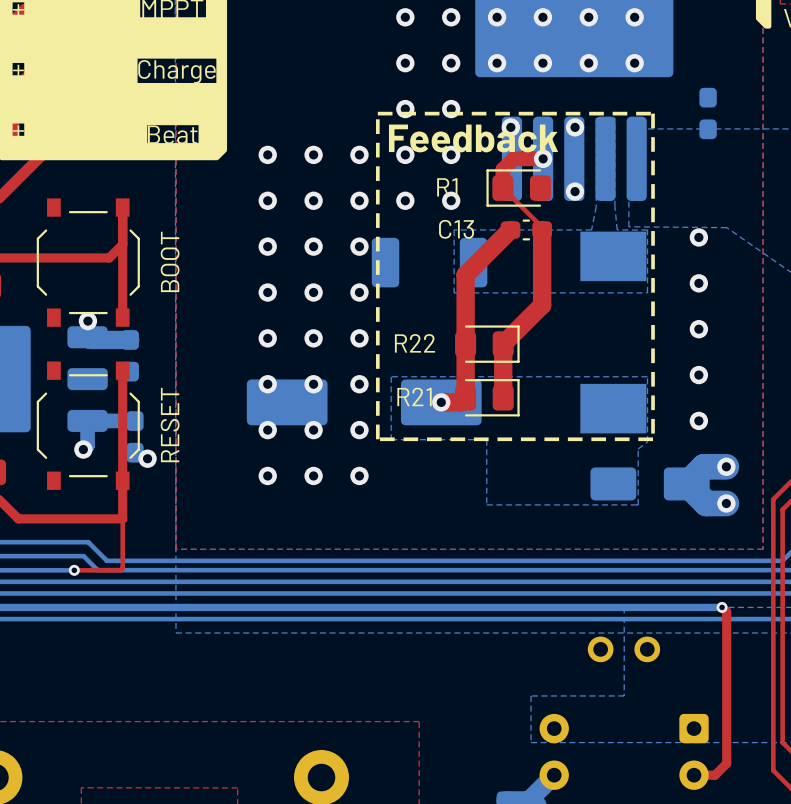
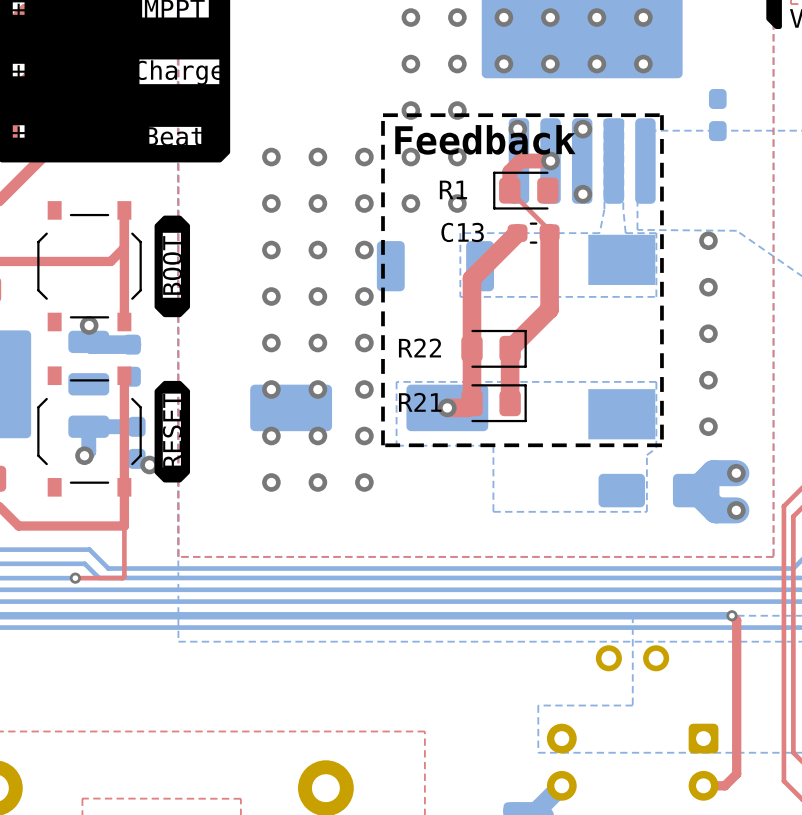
drawing: none -> [154, 215, 191, 318]
drawing: none -> [154, 380, 191, 483]

